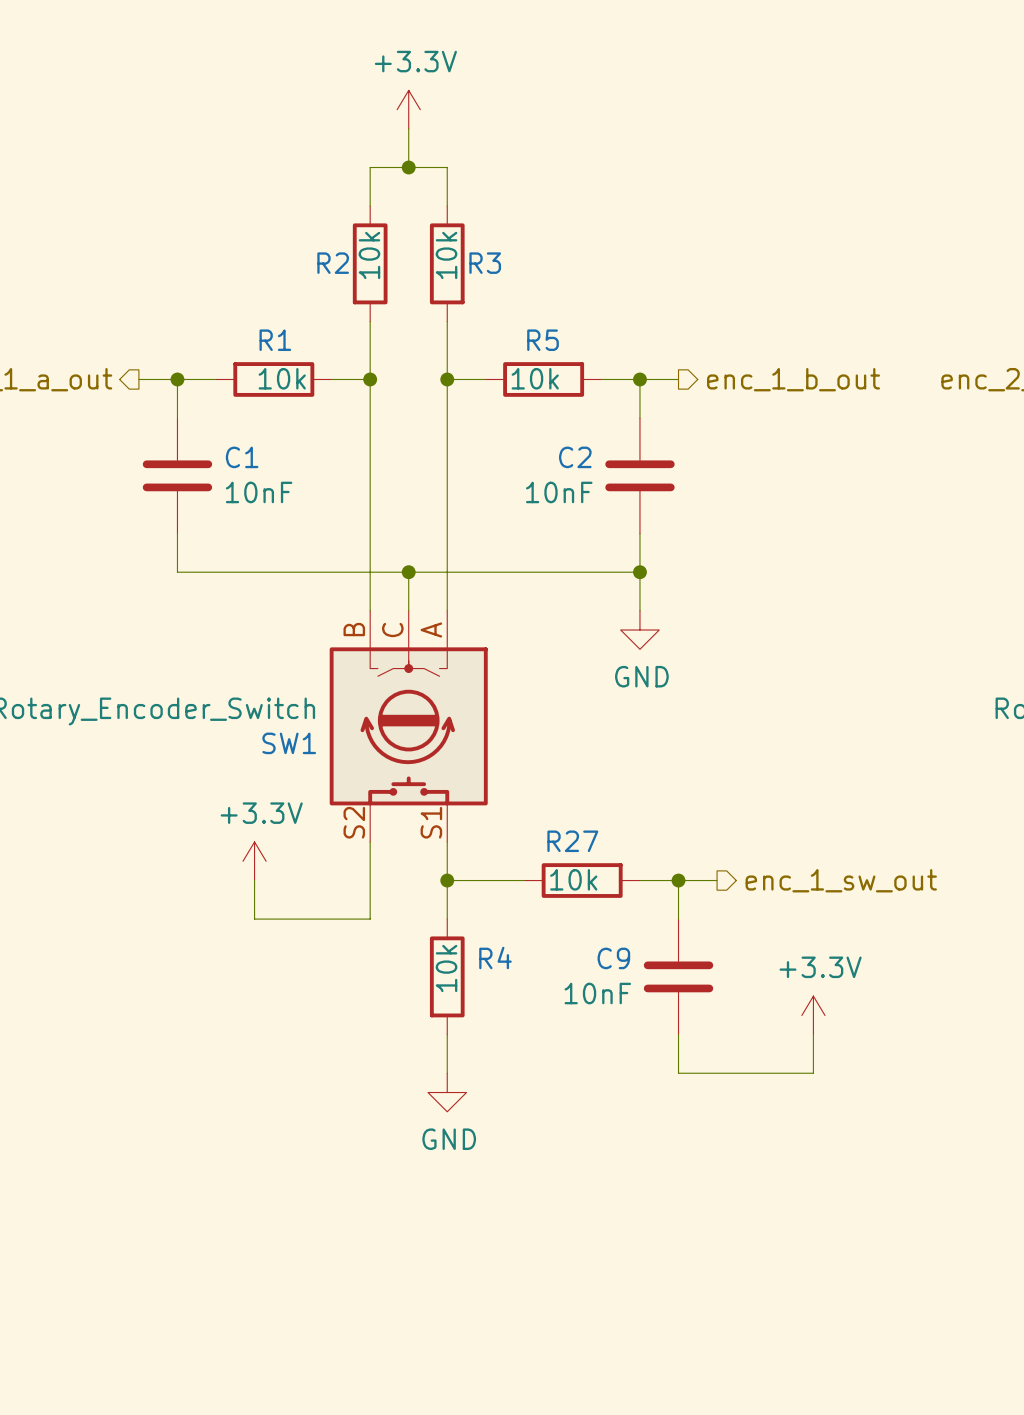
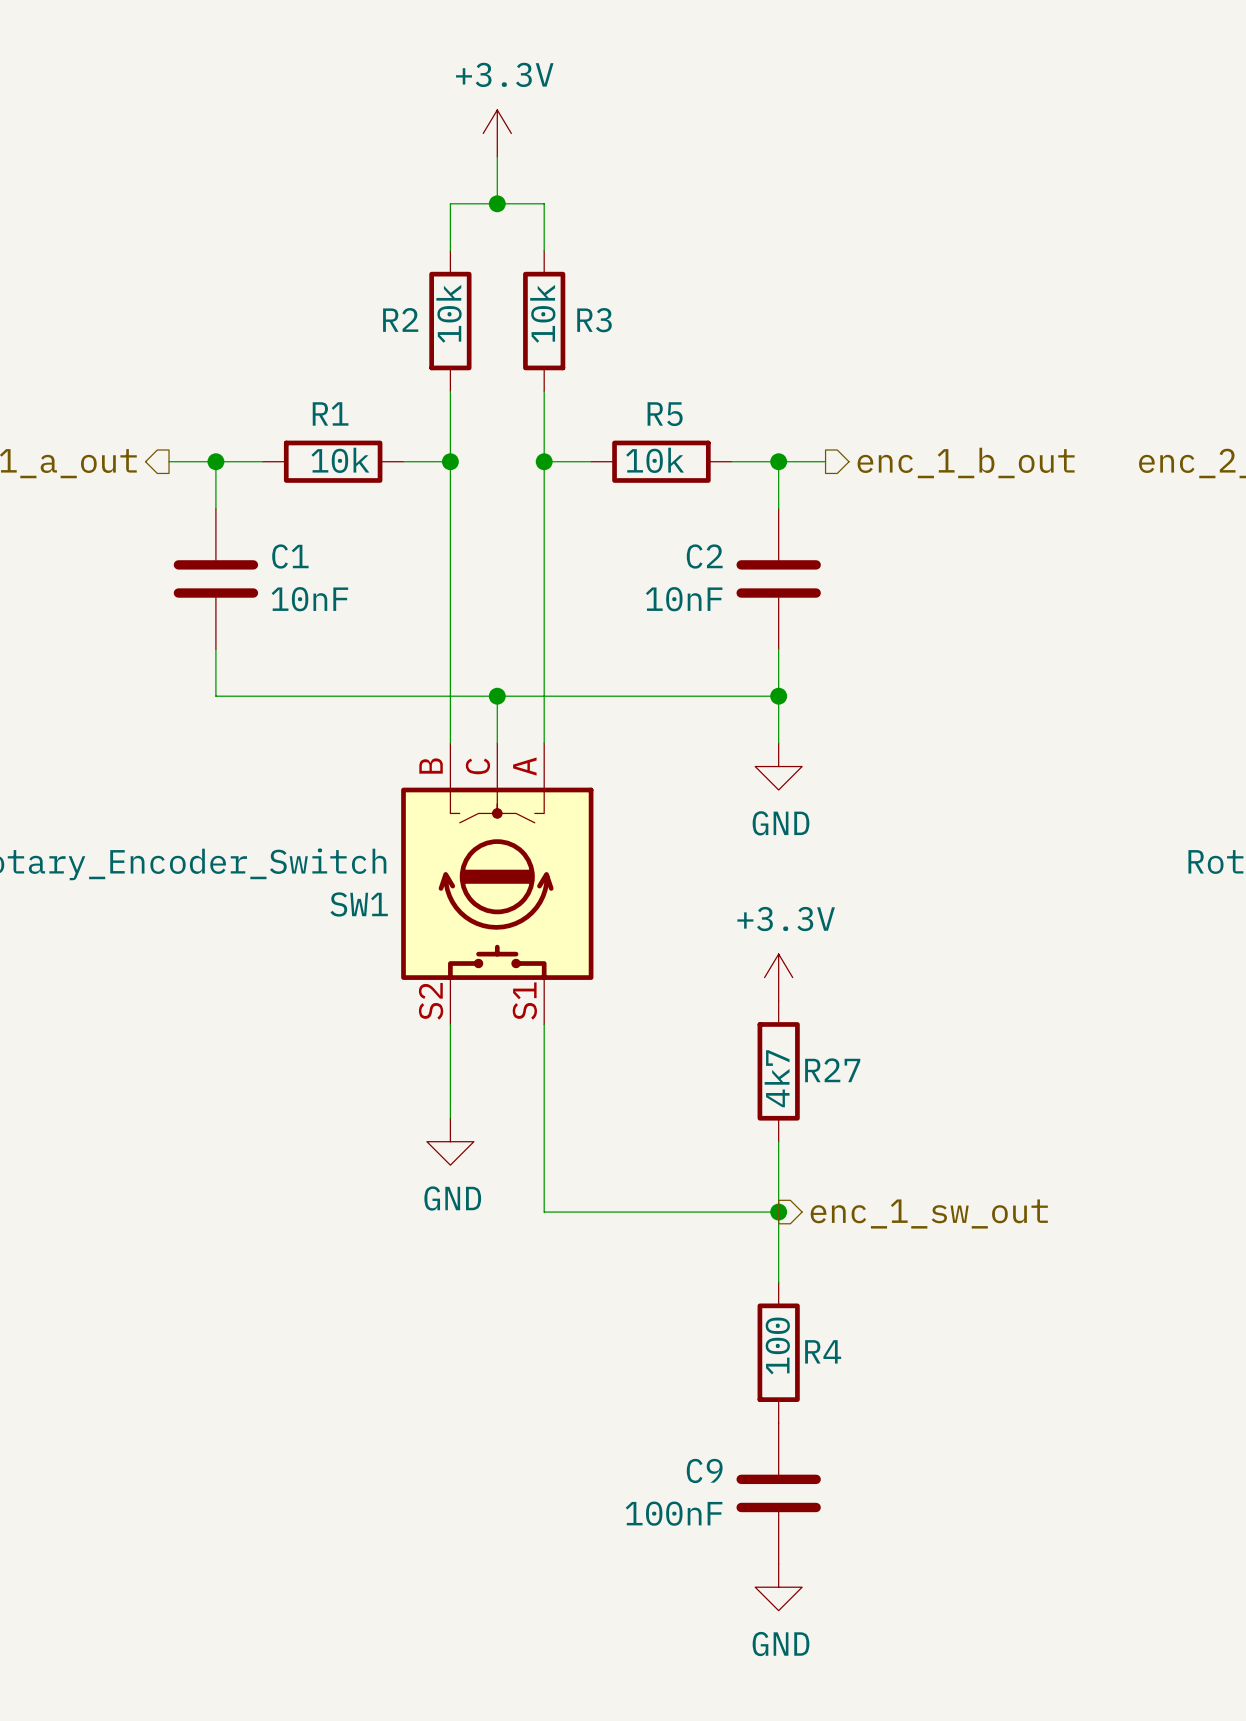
power symbol: none -> +3.3V (778, 977)
power symbol: +3.3V (254, 861) -> none
R27 value: 10k (573, 879) -> 4k7 (777, 1078)
wire: (254, 880) (254, 919) (370, 919) -> none
wire: (447, 880) (524, 880) -> none
junction: (447, 880) -> none
R27 rotation: 0° (582, 880) -> 90° clockwise (778, 1071)
wire: (639, 880) (717, 880) -> none
wire: (678, 880) (678, 919) -> none
junction: (678, 880) -> none
hierarchical label position: enc_1_sw_out (841, 880) -> enc_1_sw_out (929, 1214)
wire: none -> (544, 1118) (544, 1212) (778, 1212)
power symbol: none -> GND (450, 1141)
wire: none -> (778, 1141) (778, 1282)
R4 name position: R4 (495, 957) -> R4 (823, 1351)
R4 value: 10k (446, 968) -> 100 (777, 1346)
R4 position: (447, 976) -> (778, 1352)
C9 position: (678, 976) -> (778, 1493)
C9 value: 10nF (597, 993) -> 100nF (674, 1513)
junction: none -> (778, 1212)
power symbol: +3.3V (813, 1015) -> none
wire: (447, 1034) (447, 1073) -> none
wire: (678, 1034) (678, 1073) (813, 1073) (813, 1034) -> none
power symbol: GND (447, 1092) -> none
power symbol: none -> GND (778, 1587)

